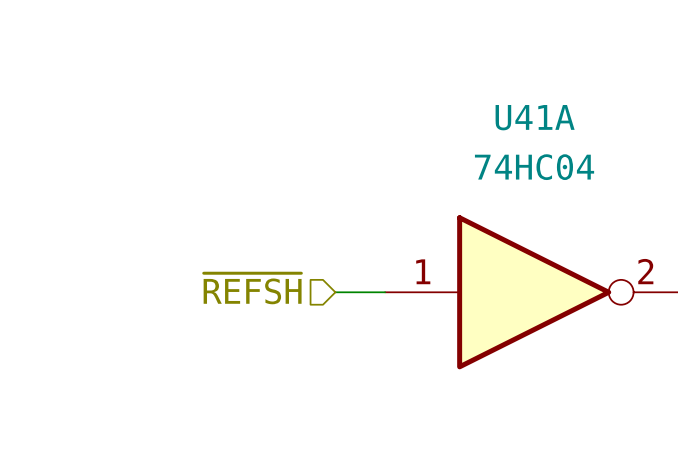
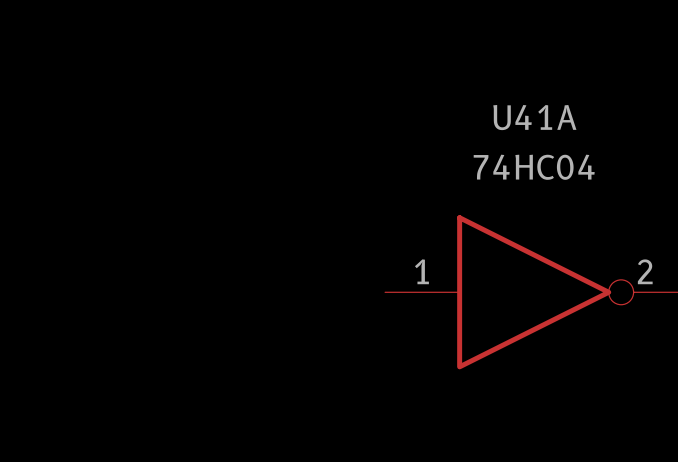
hierarchical label: ~{REFSH} (252, 288) -> none
wire: (335, 292) (385, 292) -> none

